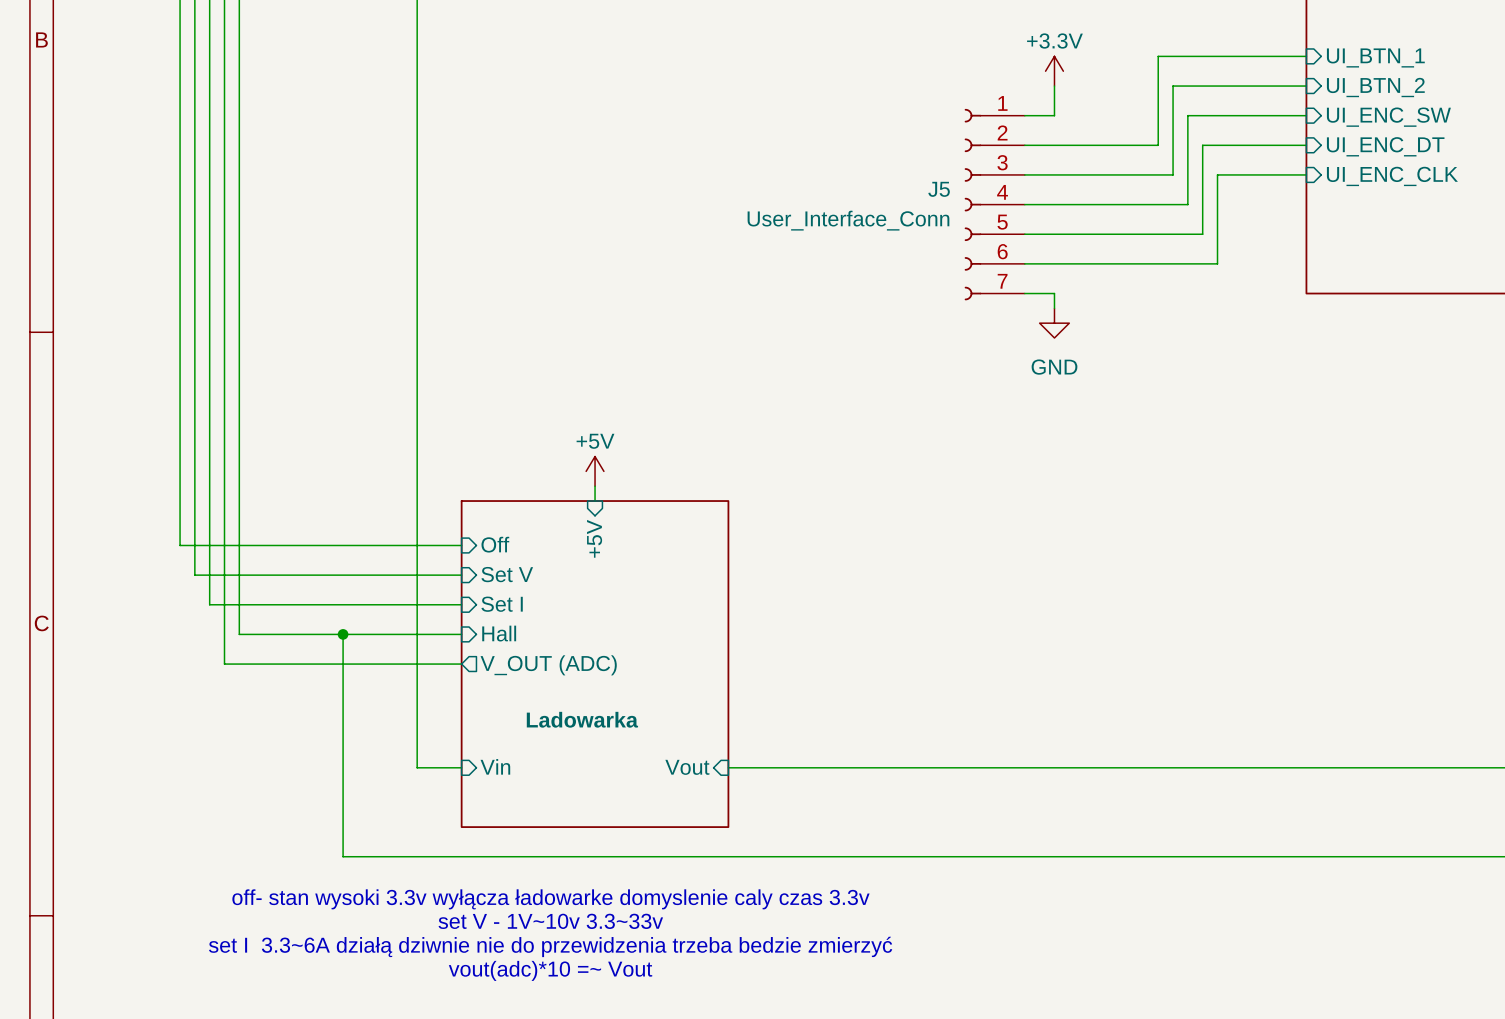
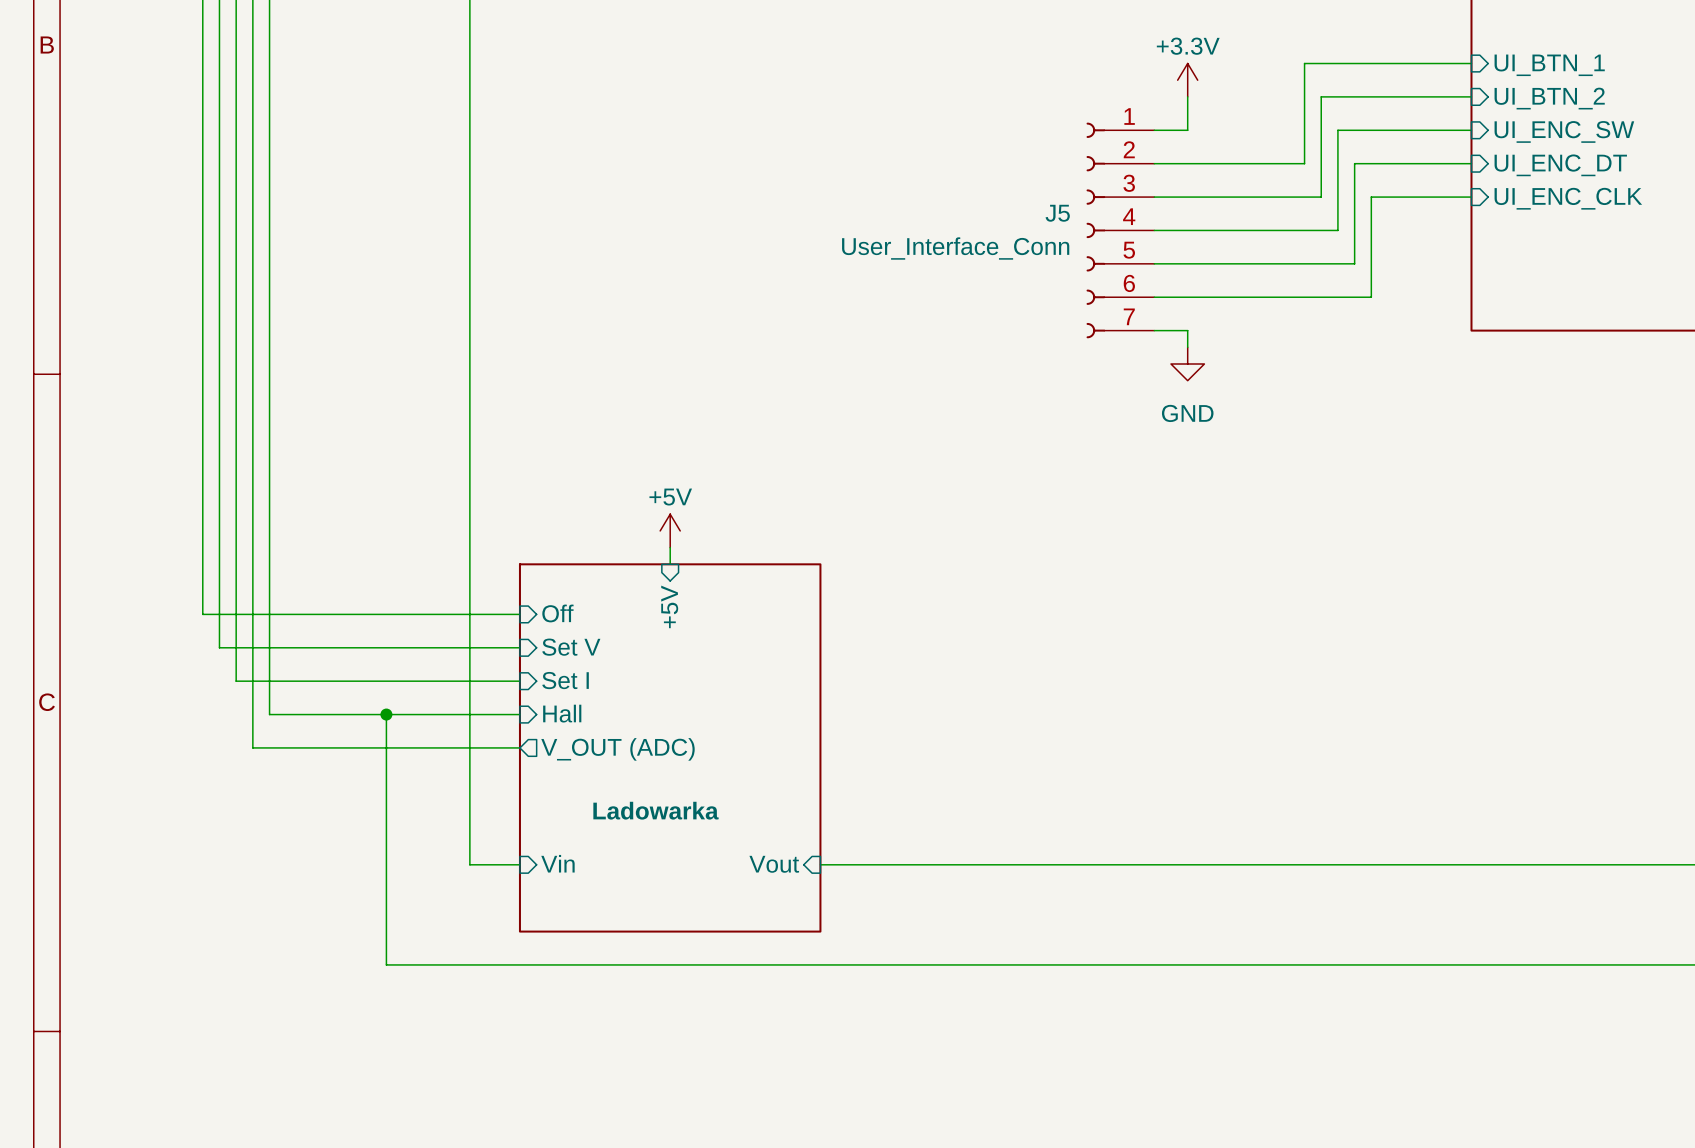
text: off- stan wysoki 3.3v wyłącza ładowarke domyslenie caly czas 3.3v (550, 899) -> none
text: set V - 1V~10v 3.3~33v (550, 921) -> none
text: set I 3.3~6A działą dziwnie nie do przewidzenia trzeba bedzie zmierzyć (550, 946) -> none
text: vout(adc)*10 =~ Vout (550, 970) -> none

